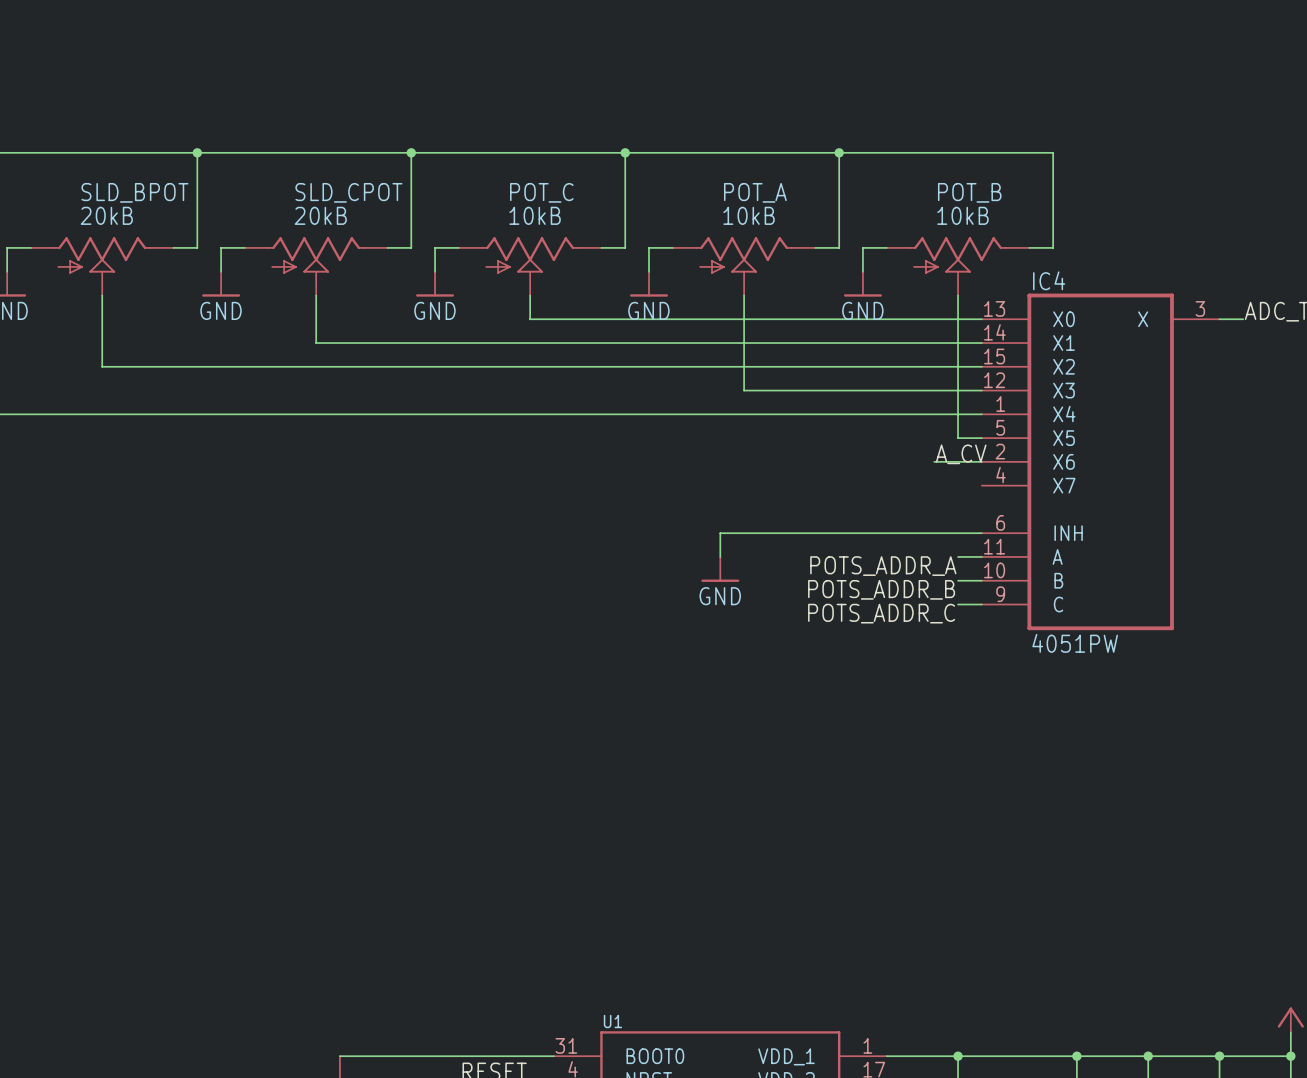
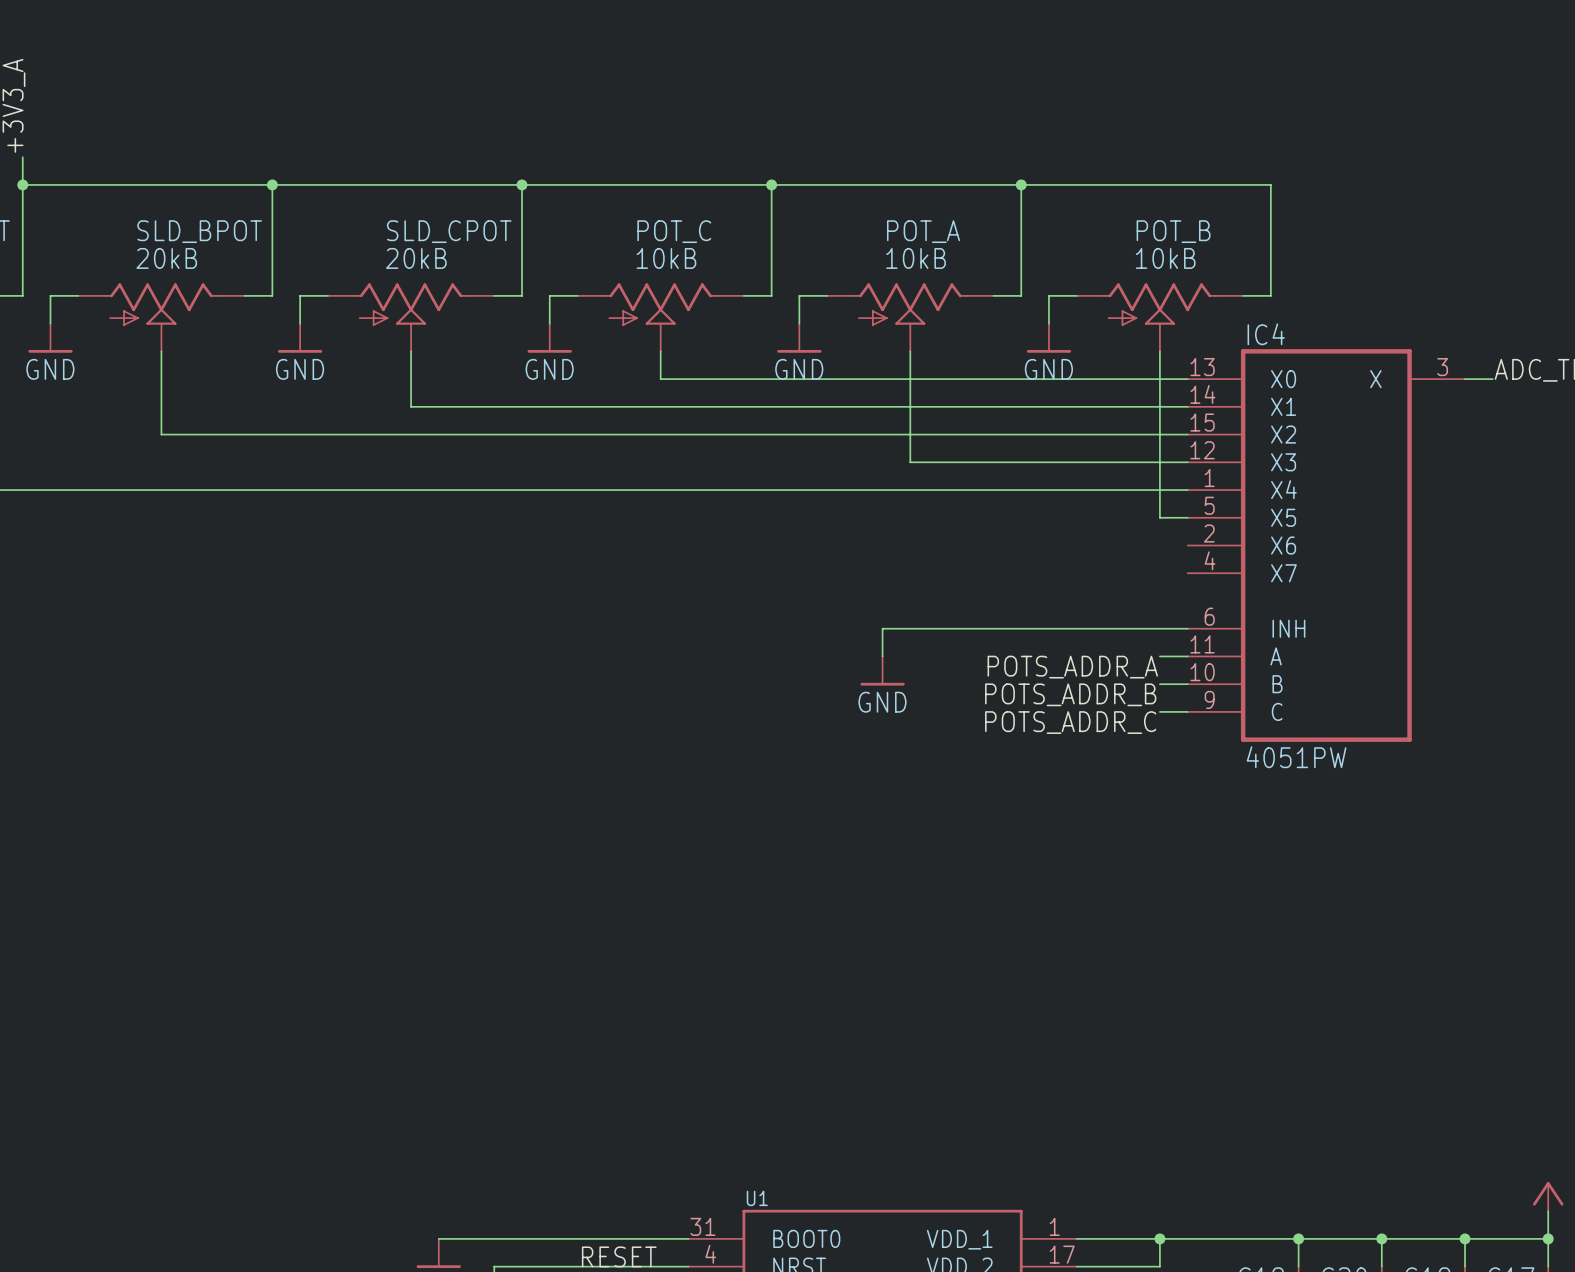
label: A_CV (961, 454) -> none
wire: (934, 461) (981, 461) -> none

